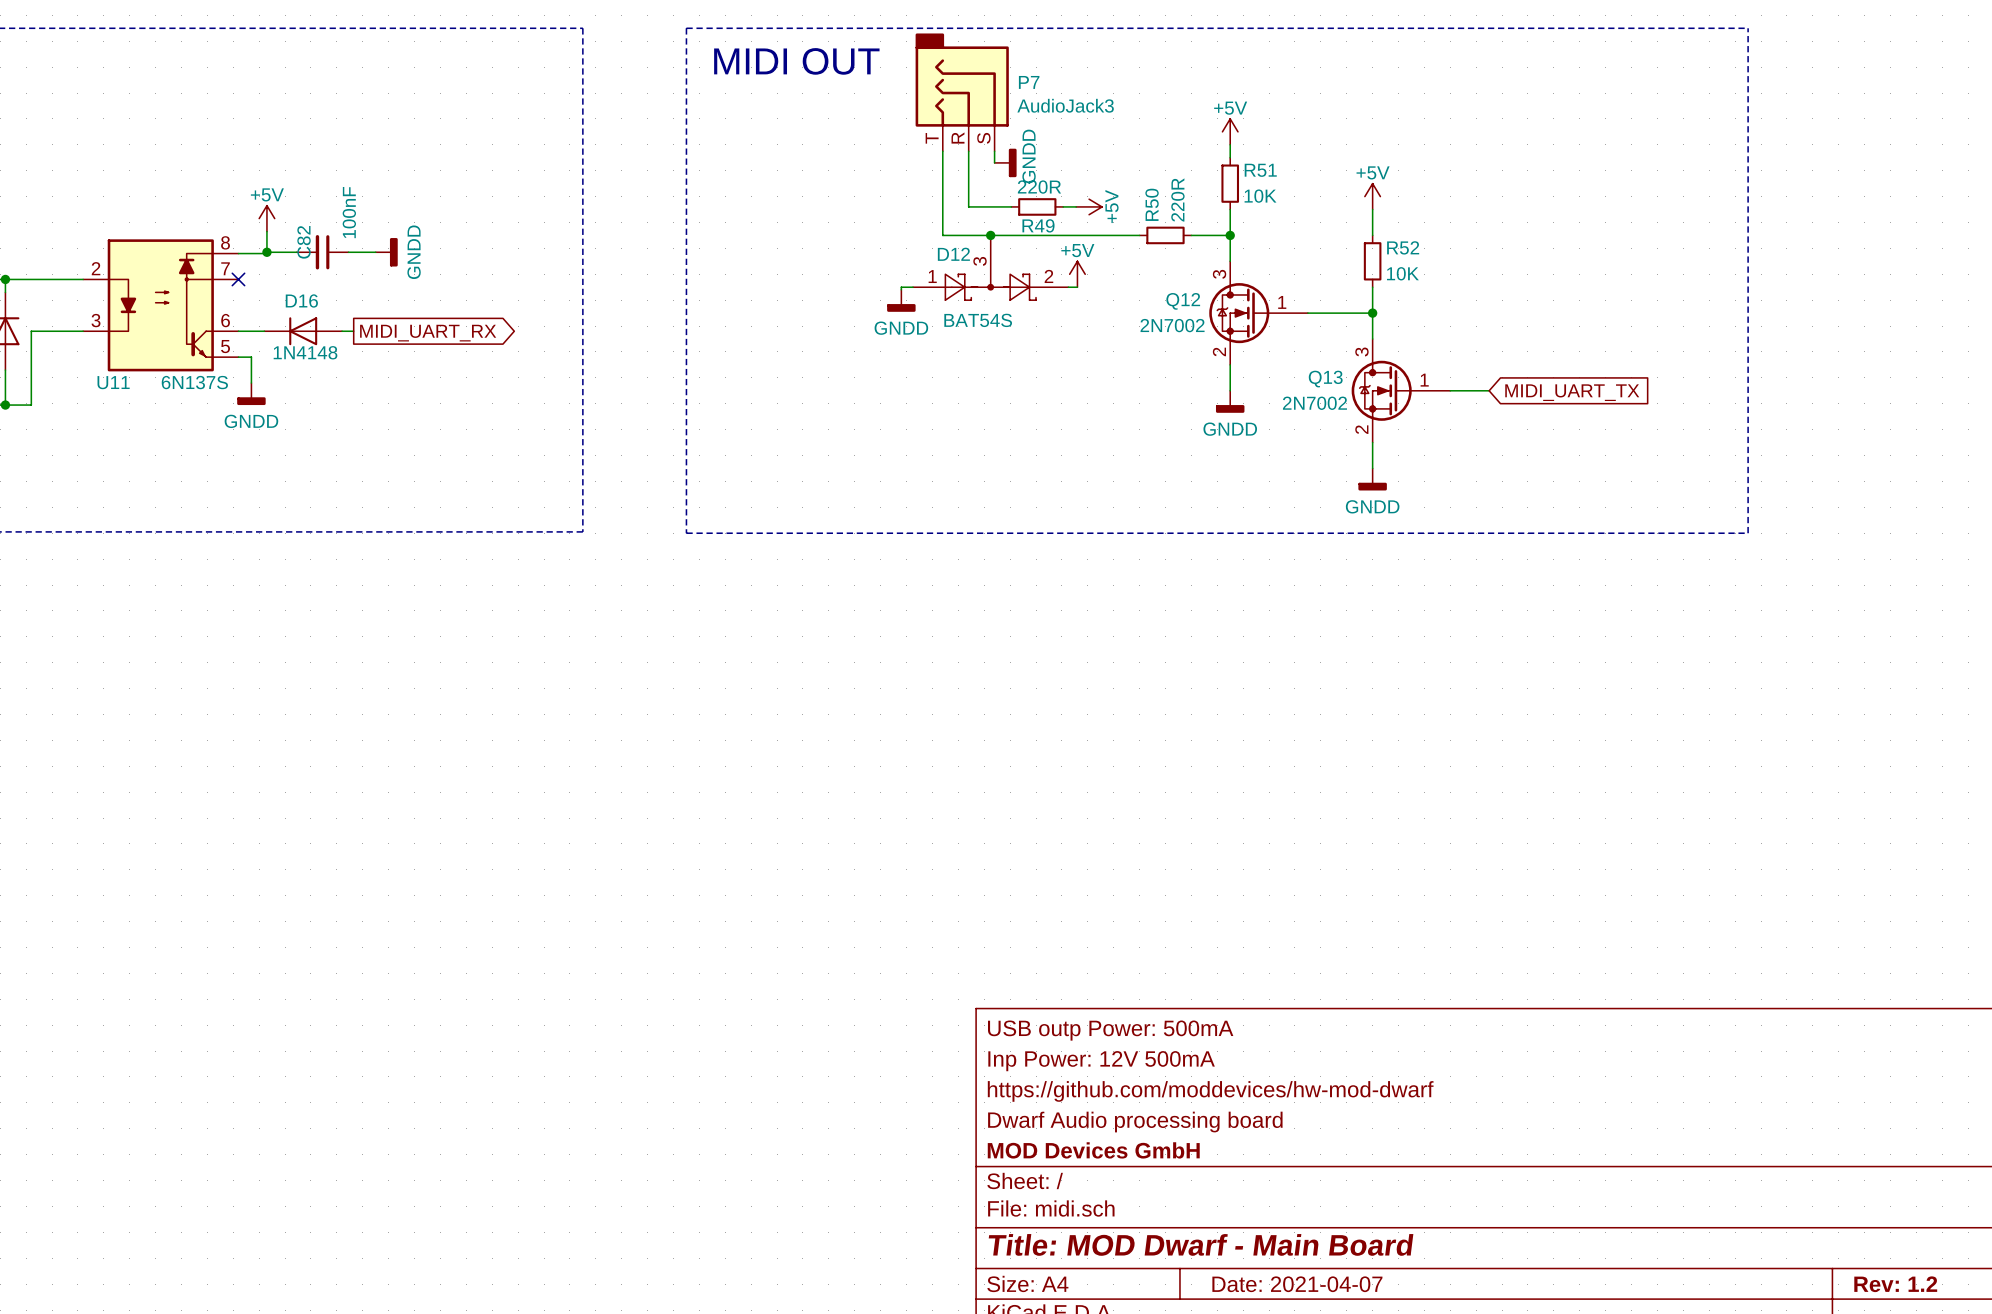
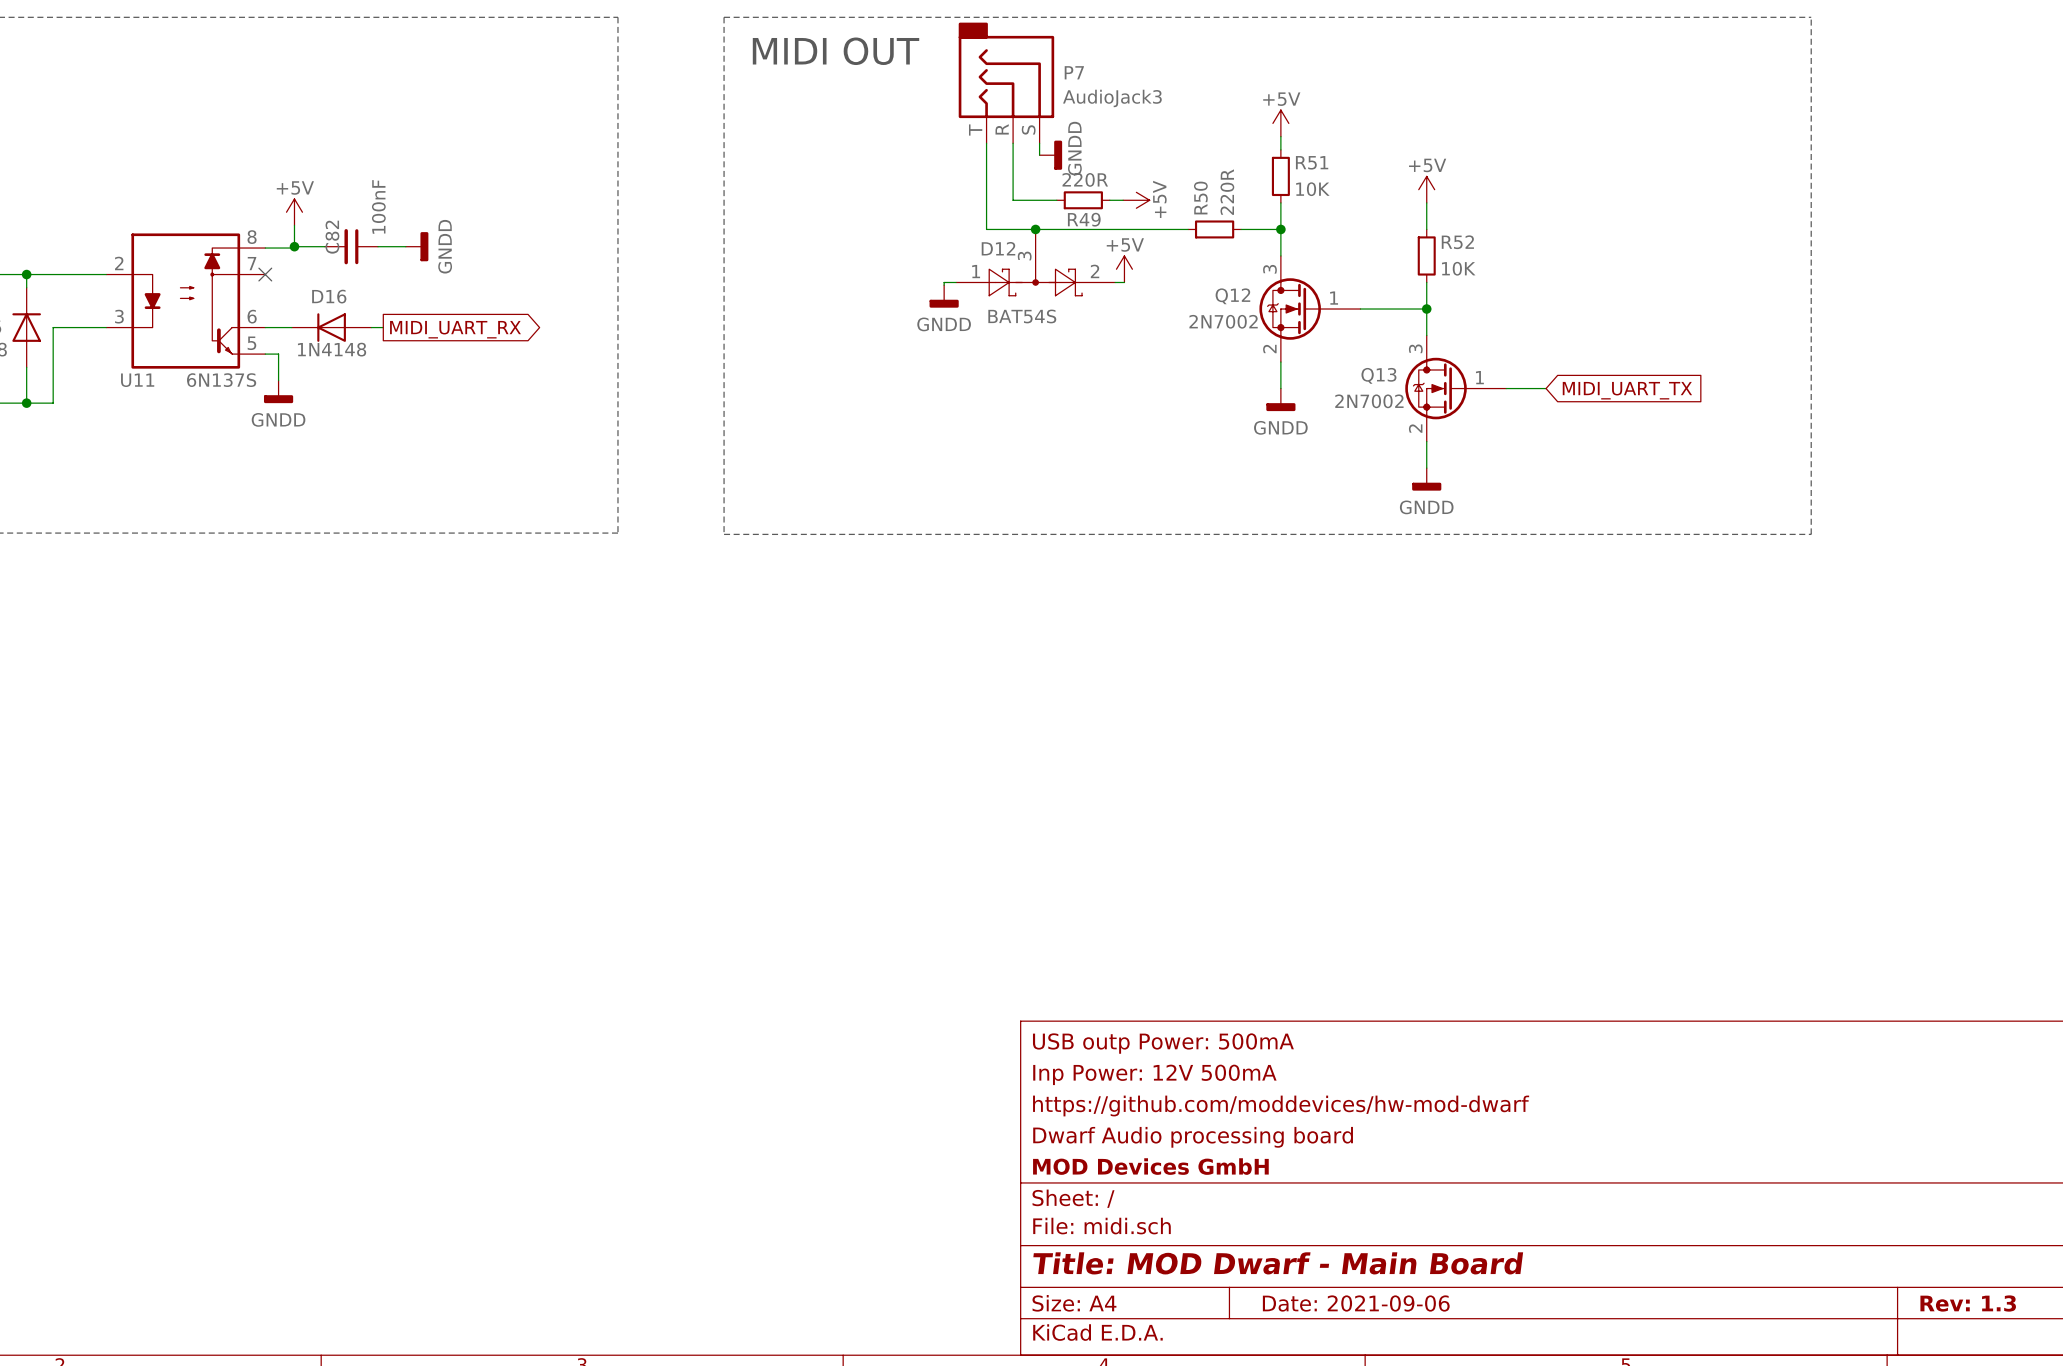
title block: Date: 2021-04-07 (1297, 1284) -> Date: 2021-09-06 (1356, 1303)
title block: Rev: 1.2 (1895, 1284) -> Rev: 1.3 (1968, 1303)

